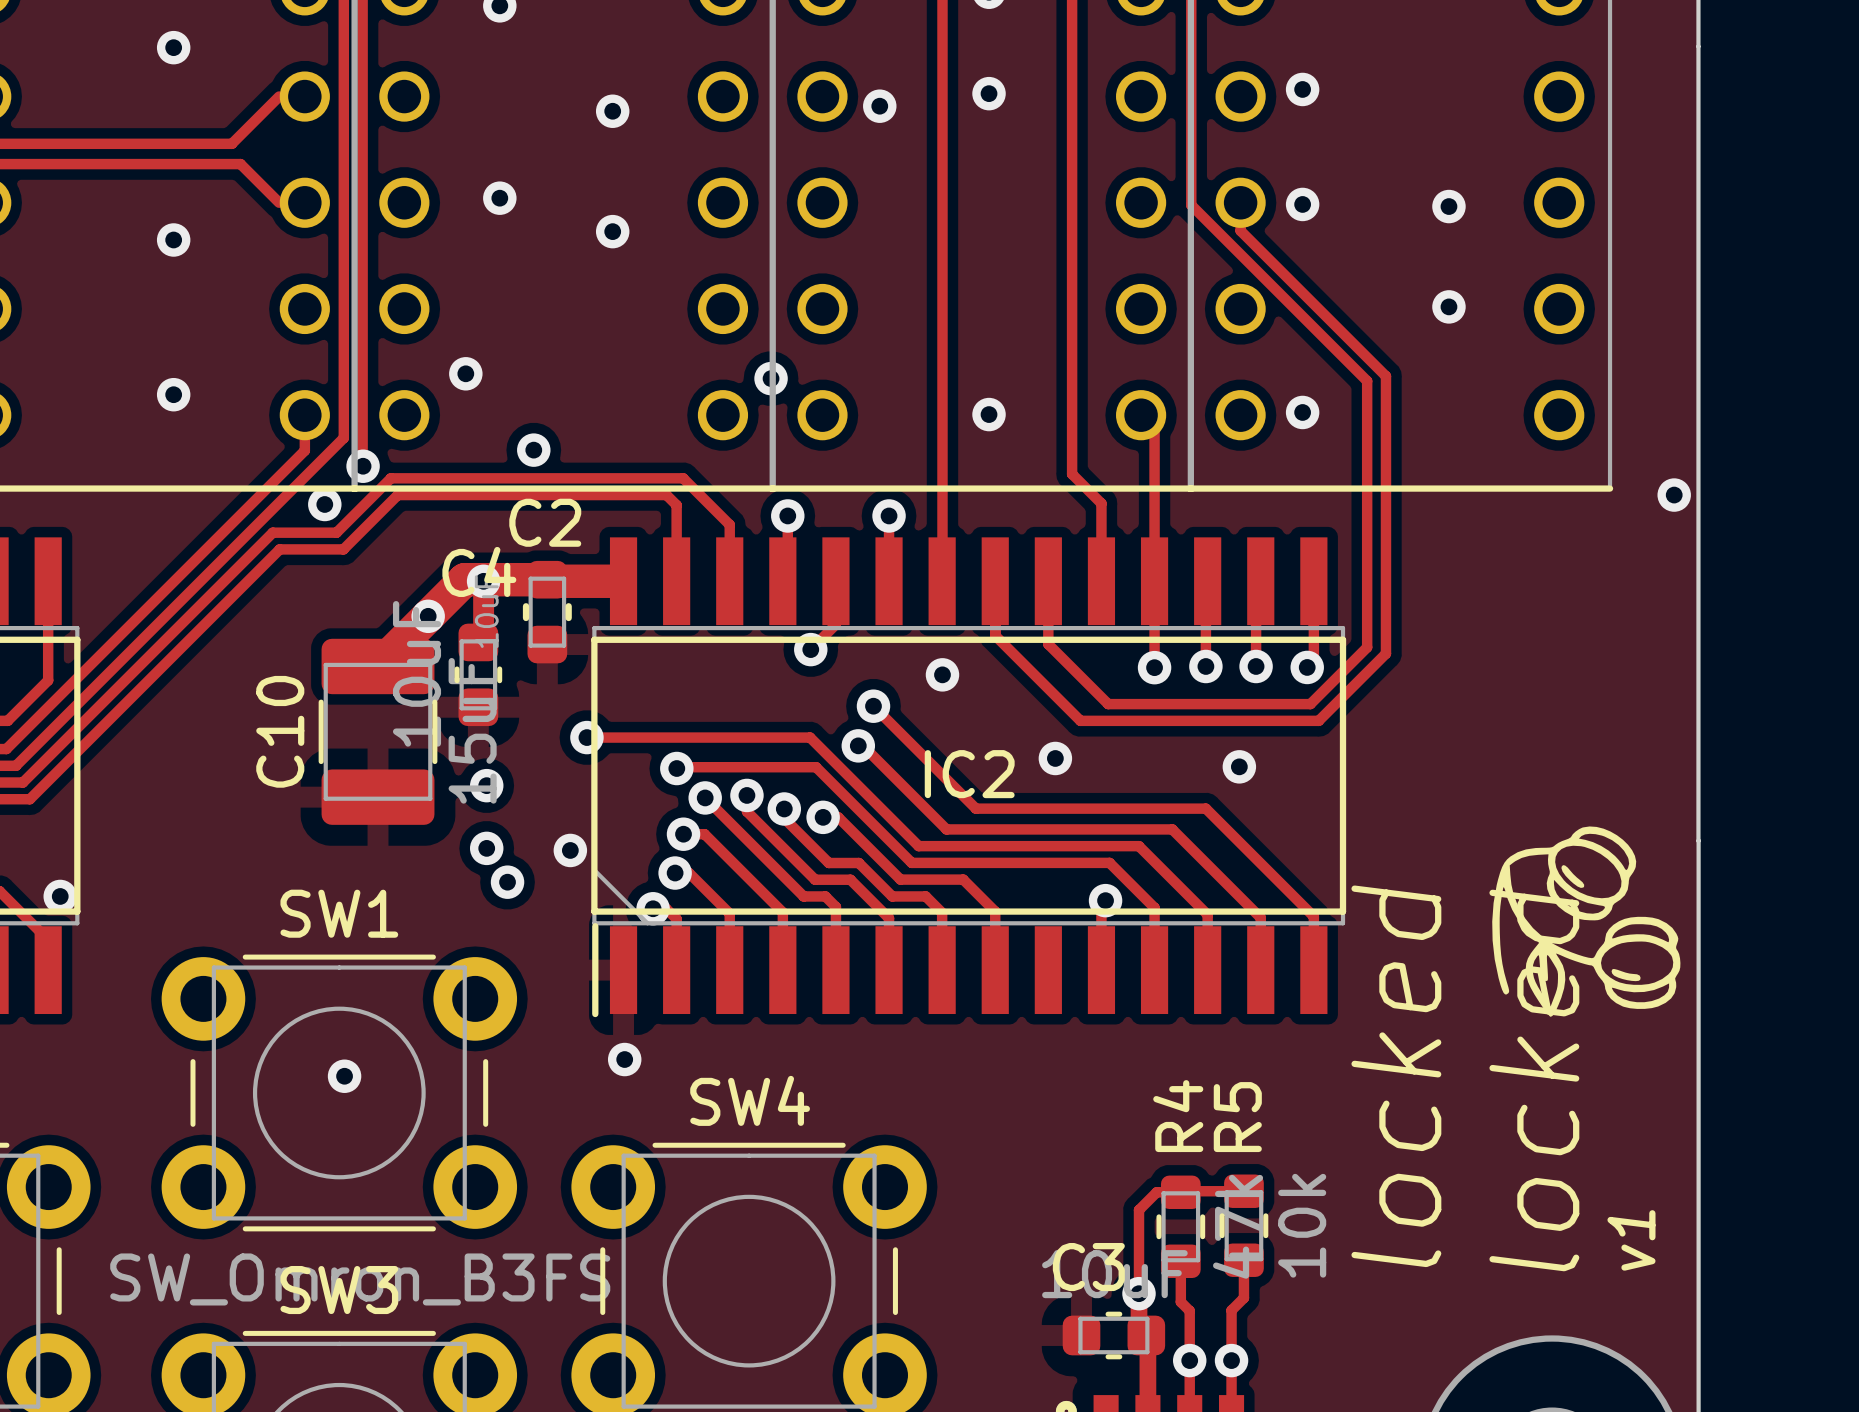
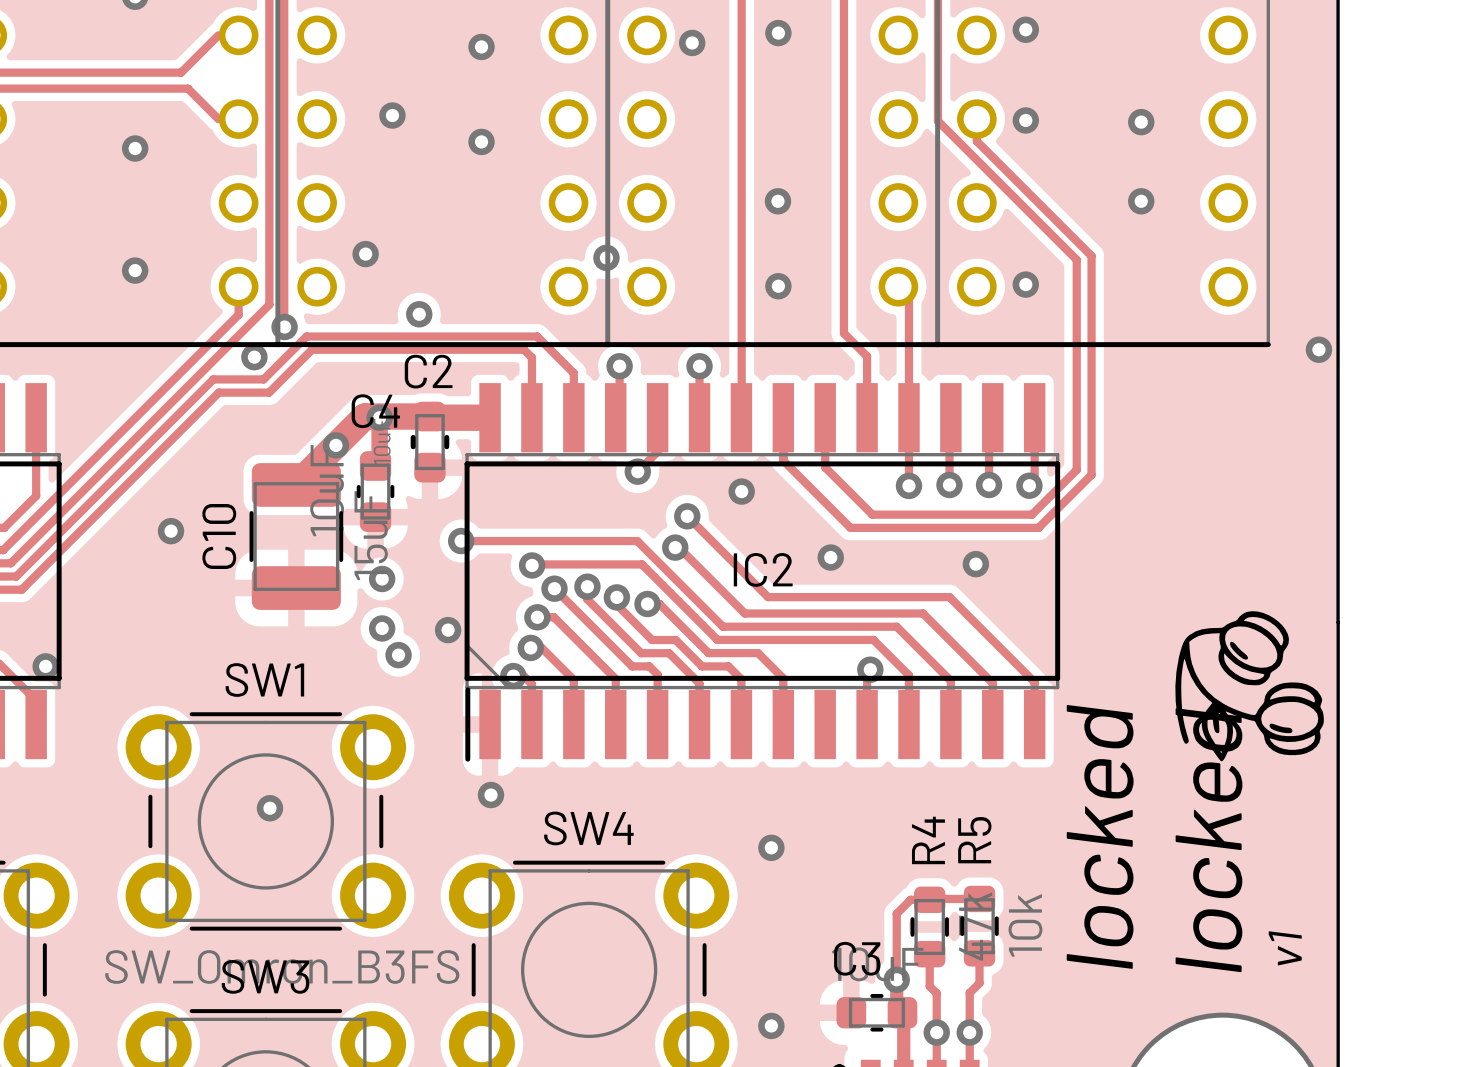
via: none -> (777, 201)
via: none -> (171, 531)
via: none -> (771, 847)
via: none -> (771, 1025)

